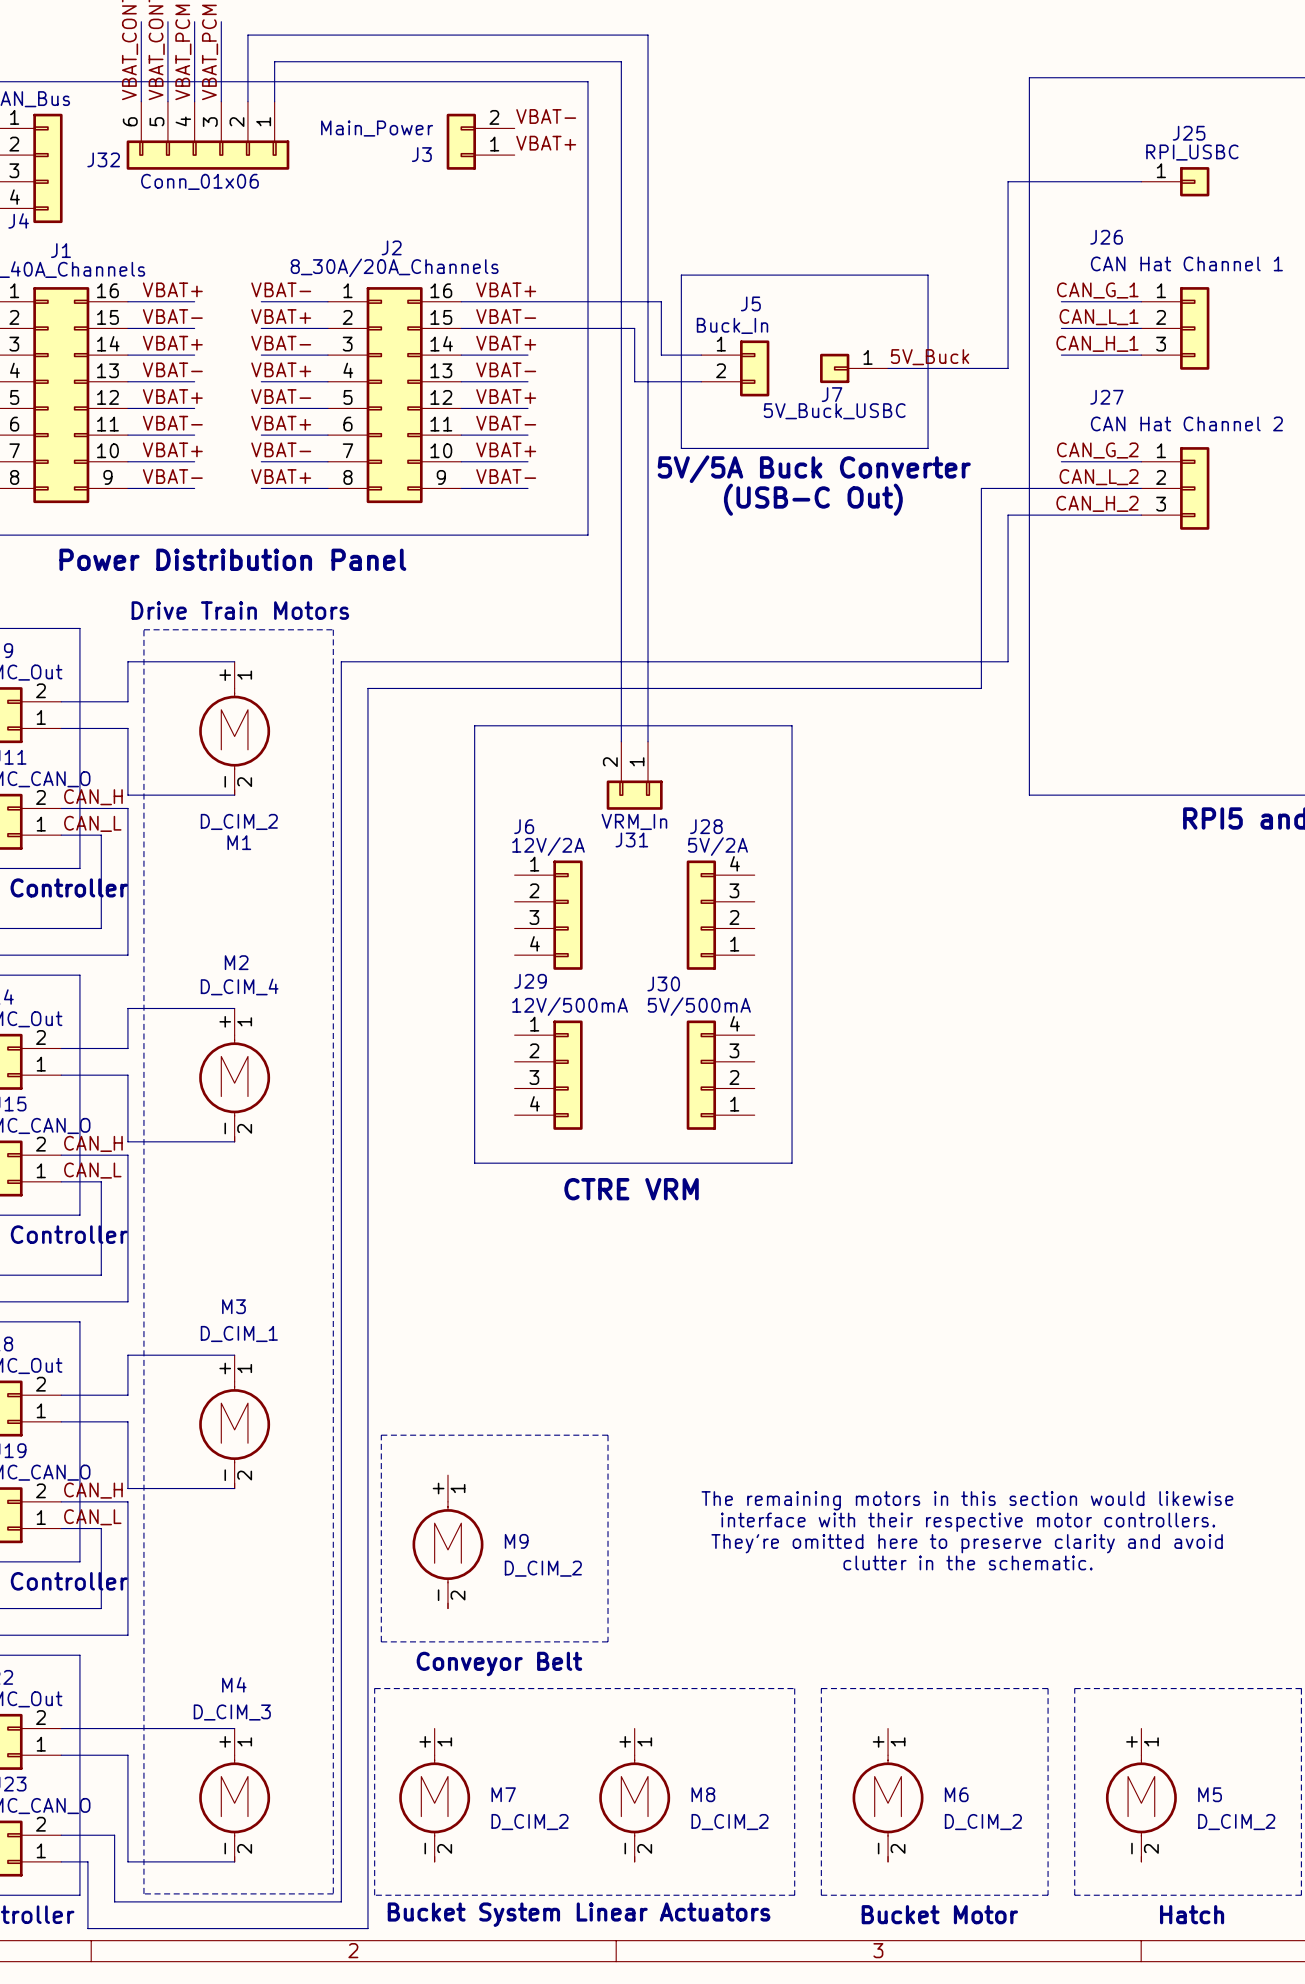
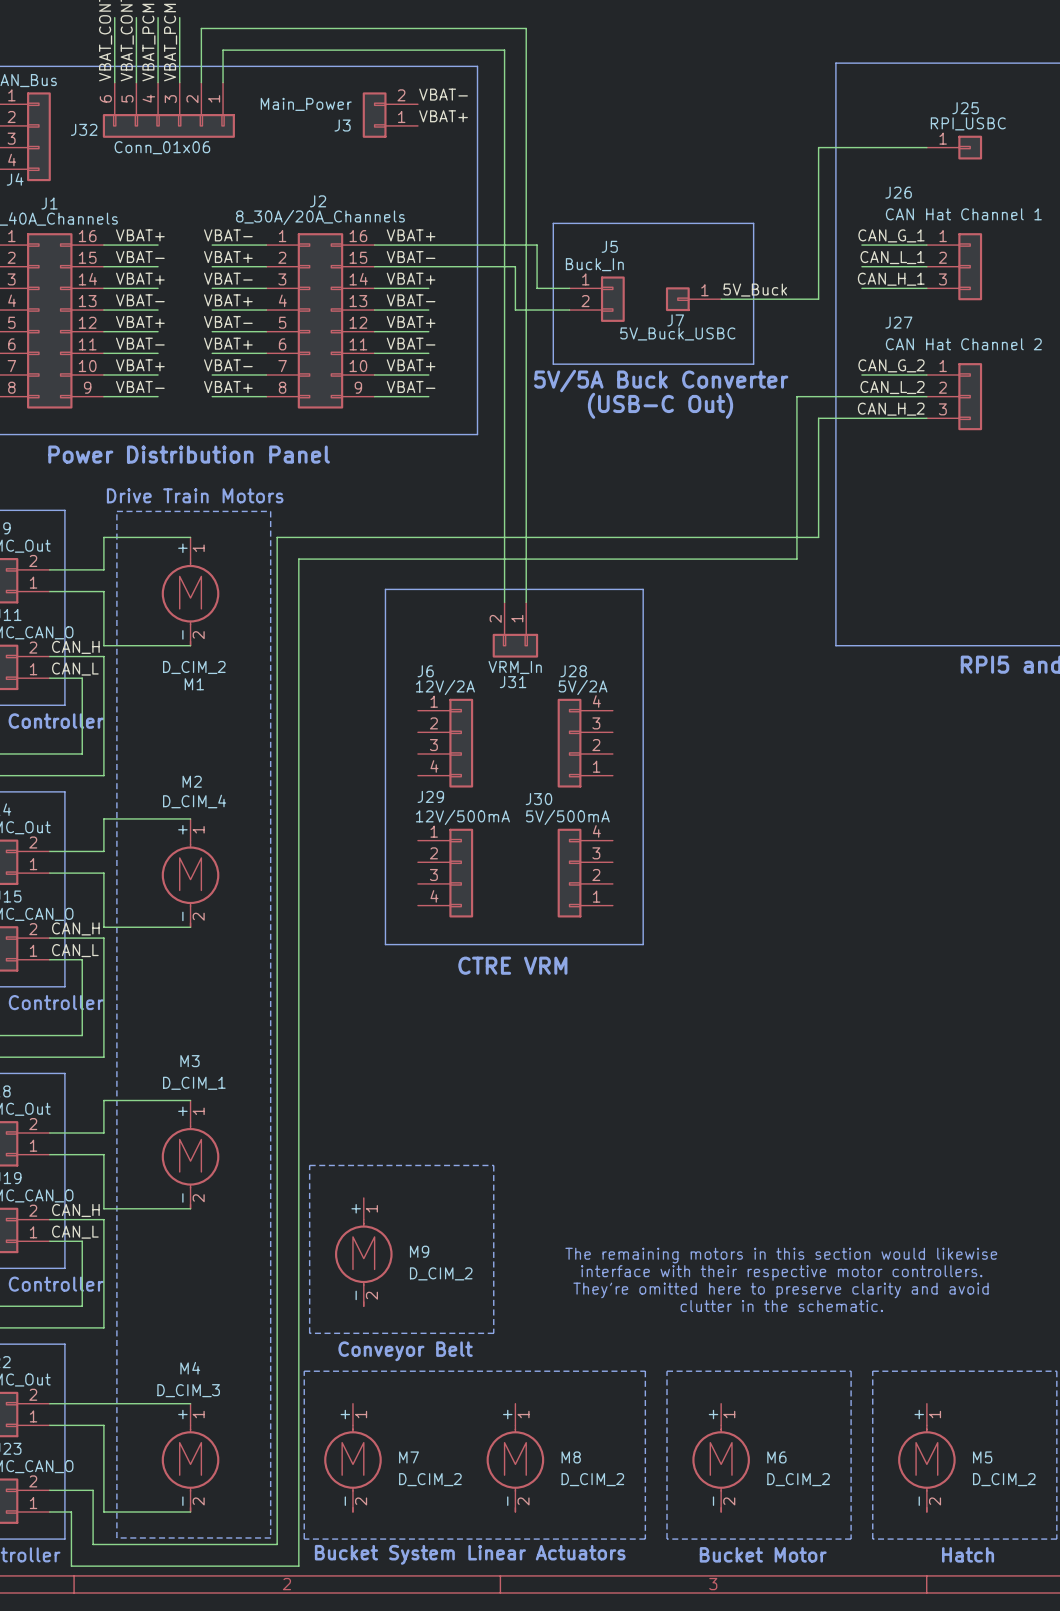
text: The remaining motors in this section would likewise (967, 1500) -> none
text: interface with their respective motor controllers. (968, 1522) -> none
text: They're omitted here to preserve clarity and avoid (967, 1543) -> The remaining motors in this section would likewise (781, 1255)
text: clutter in the schematic. (968, 1562) -> interface with their respective motor controllers. (781, 1272)
text: none -> They're omitted here to preserve clarity and avoid (781, 1290)
text: none -> clutter in the schematic. (781, 1306)

